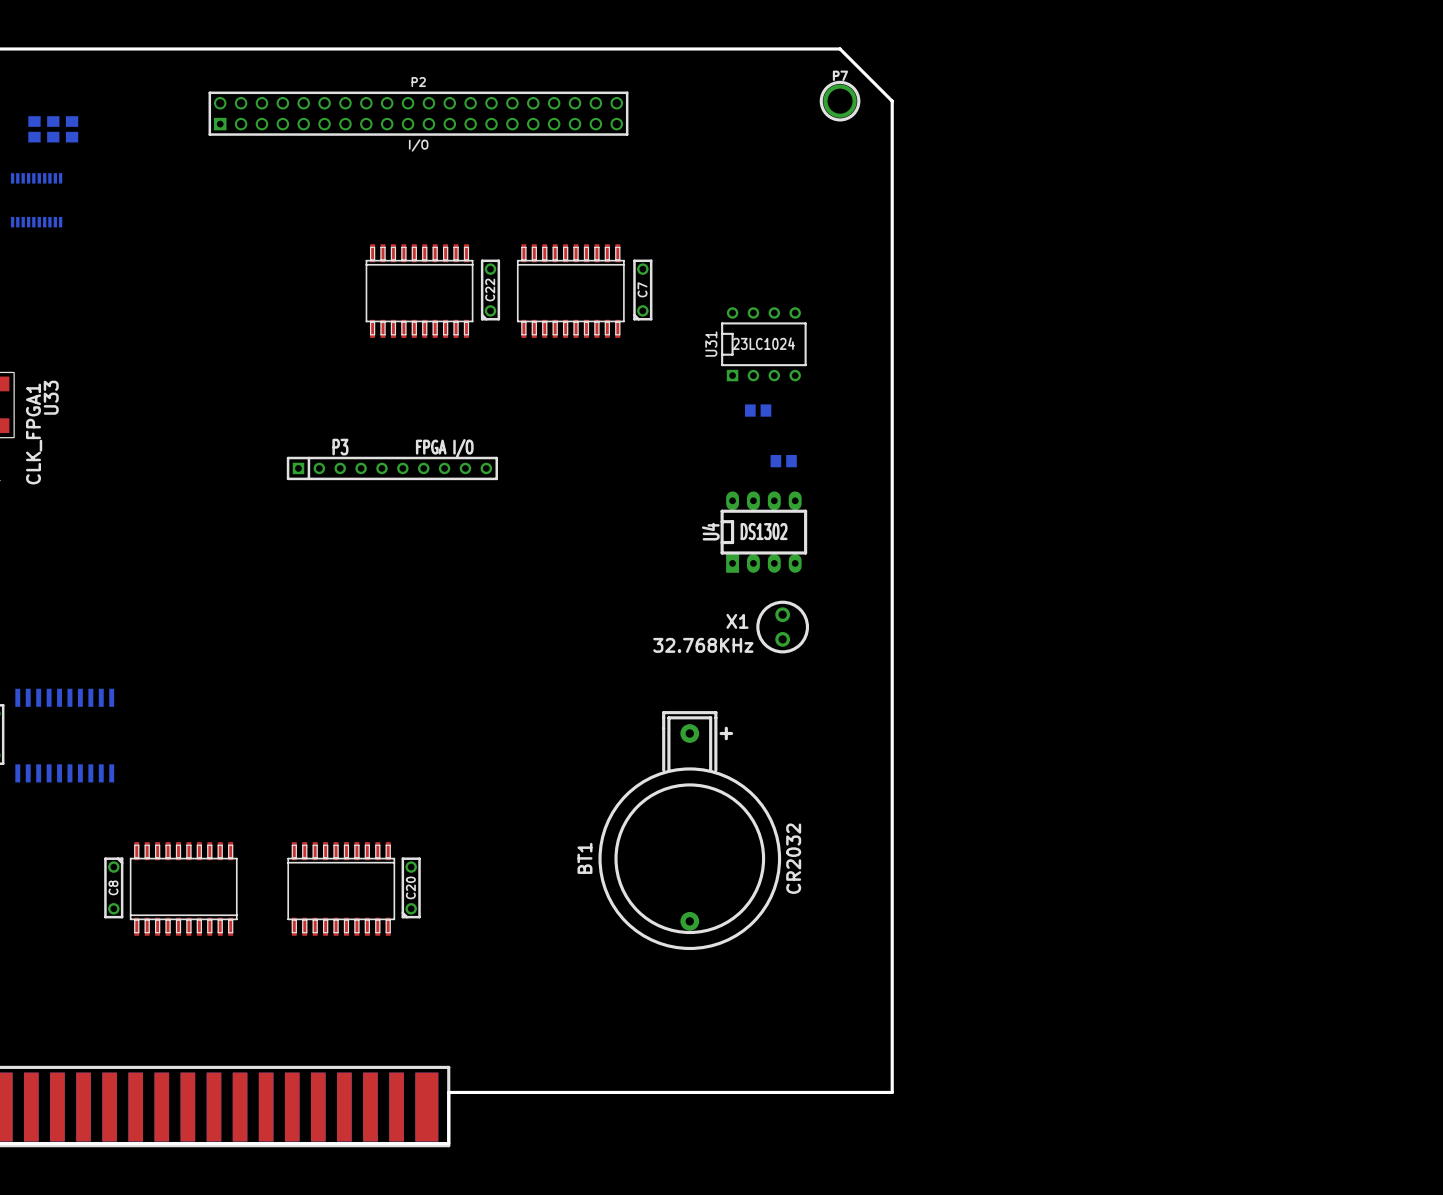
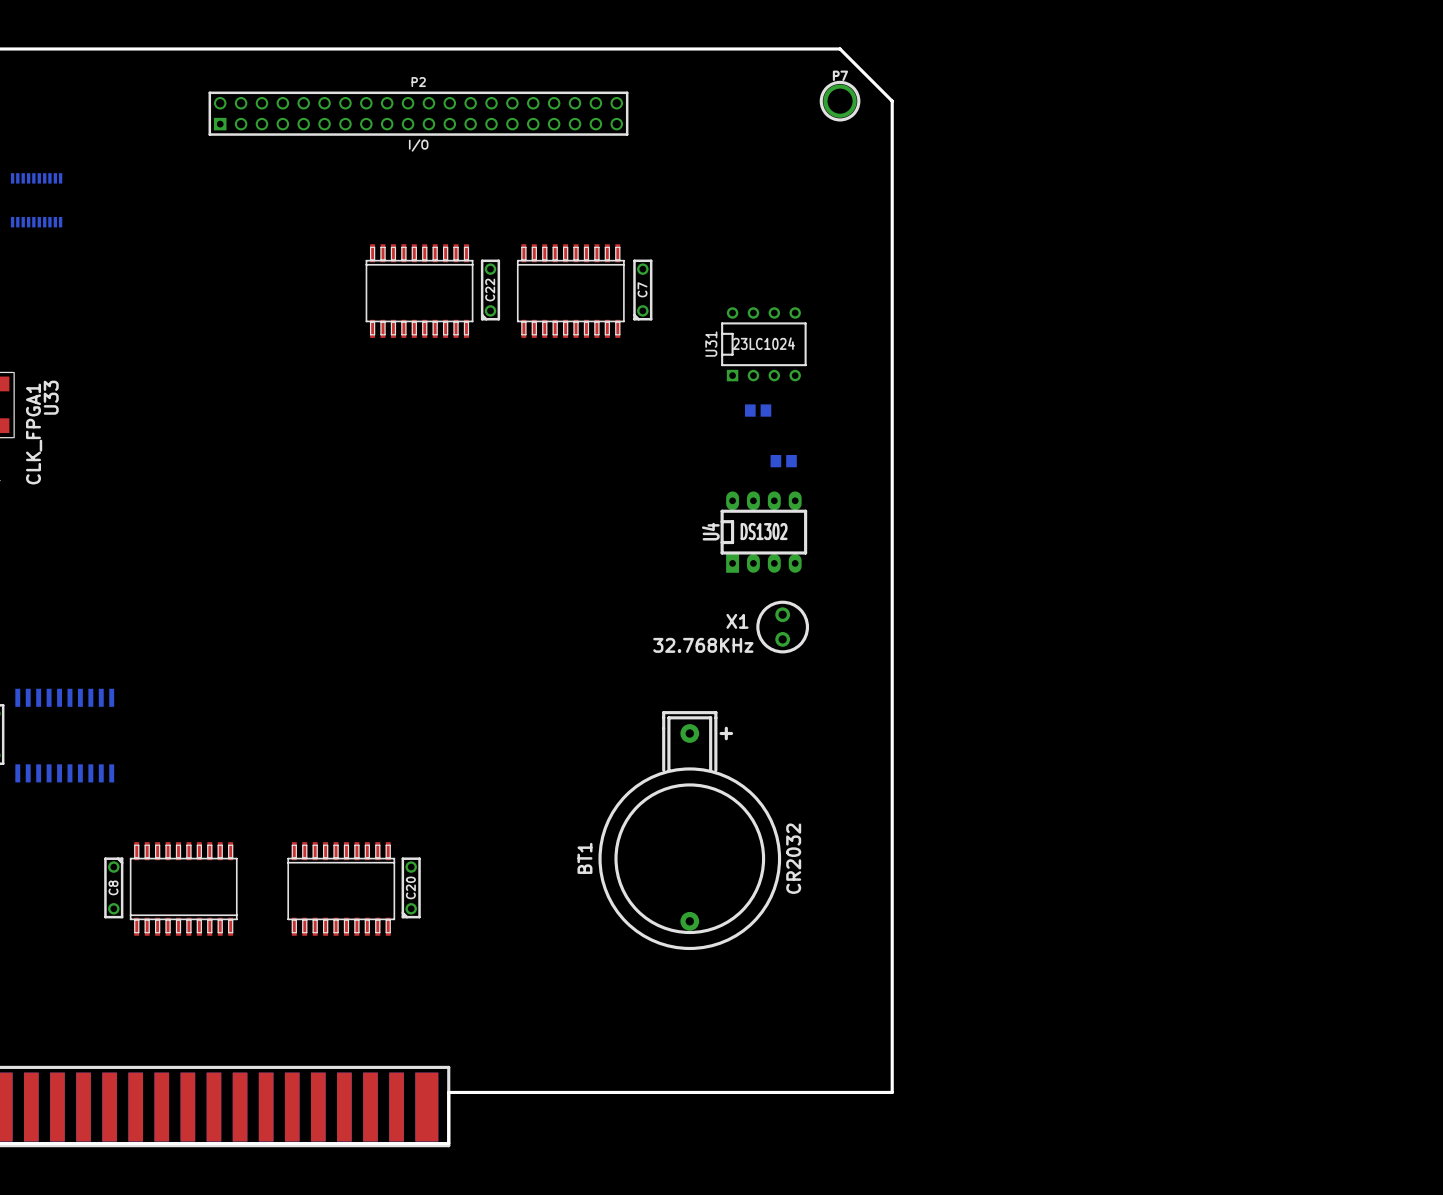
part: (34, 129) -> none
part: (53, 129) -> none
part: (72, 129) -> none
P3: FPGA I/O (392, 468) -> none

